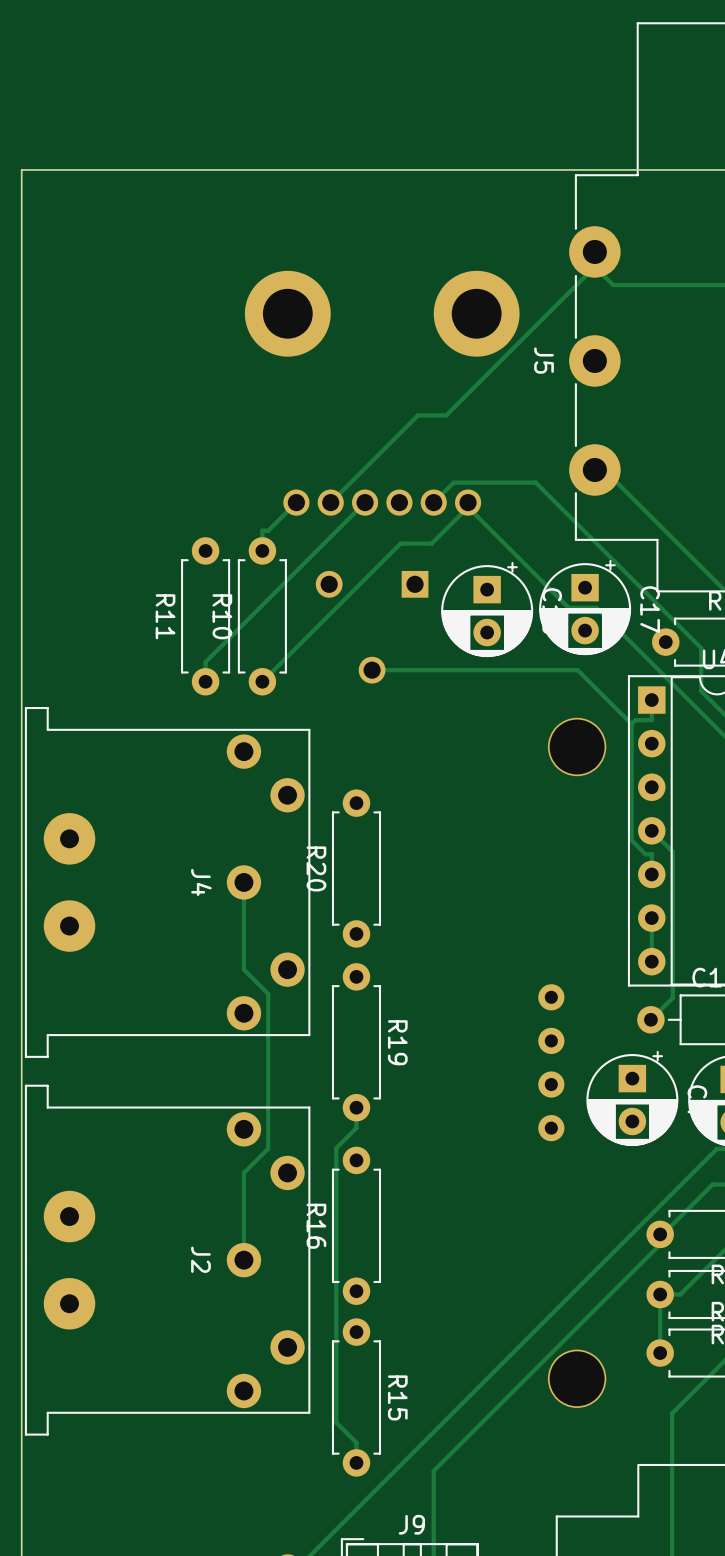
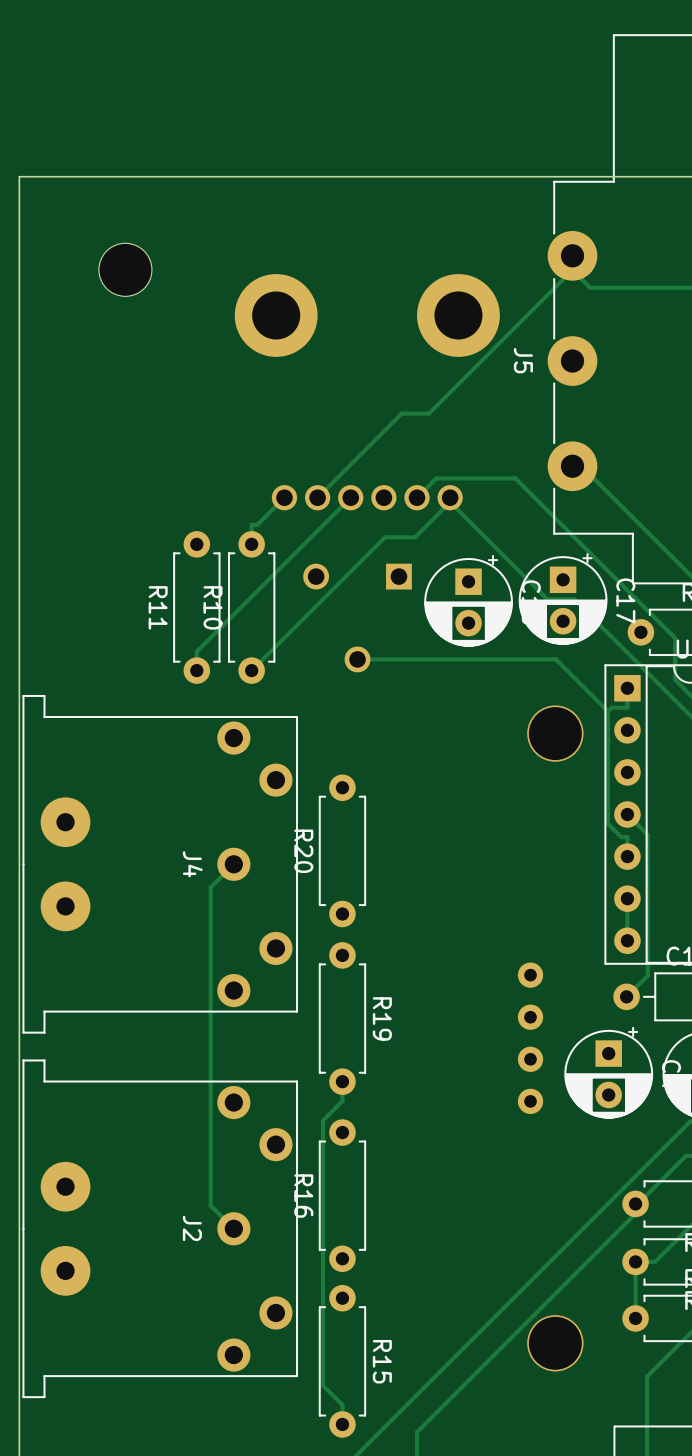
part: none -> (125, 269)
track: (243, 882) (243, 969) (268, 993) (268, 1148) (243, 1172) (243, 1260) -> (233, 864) (210, 887) (210, 1205) (233, 1228)

